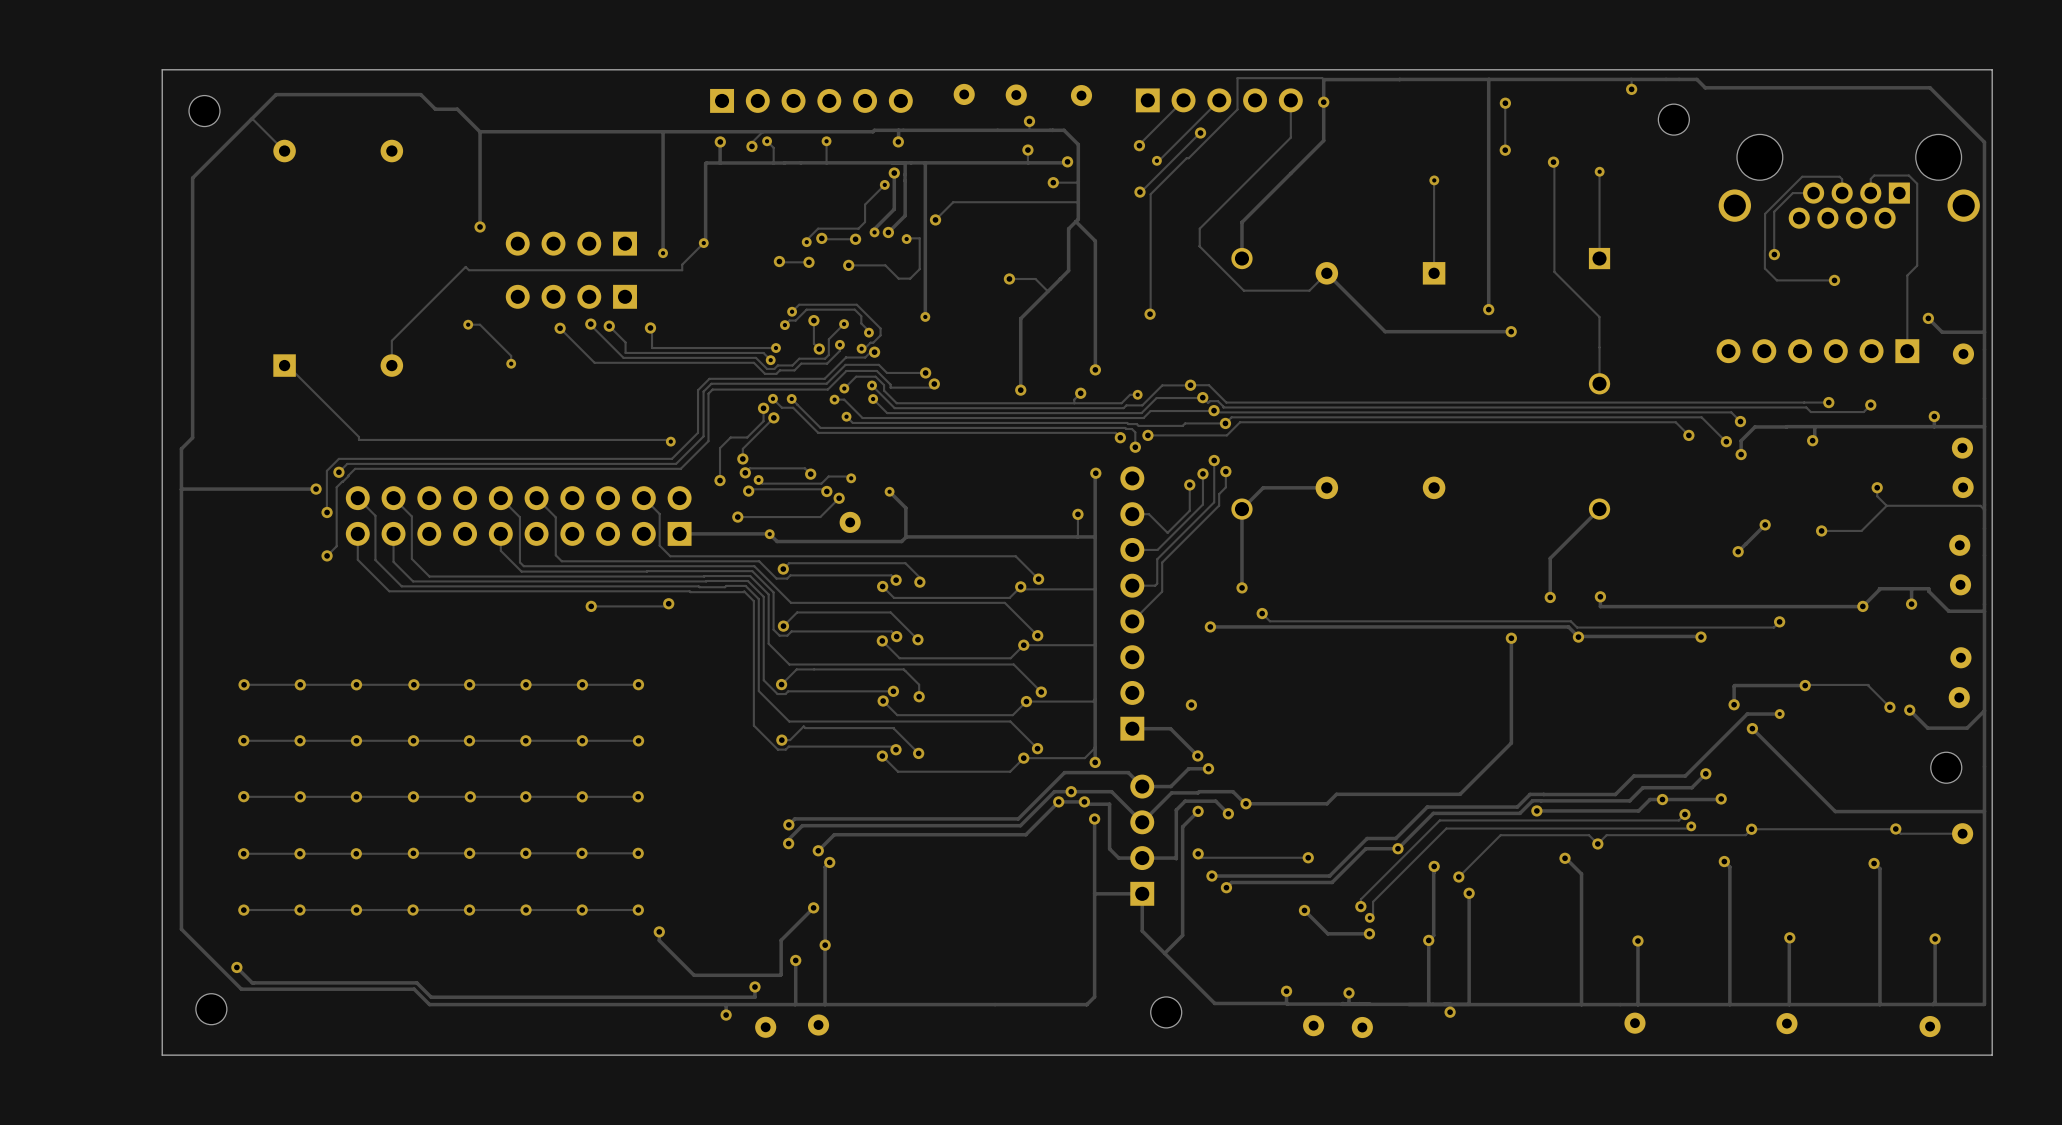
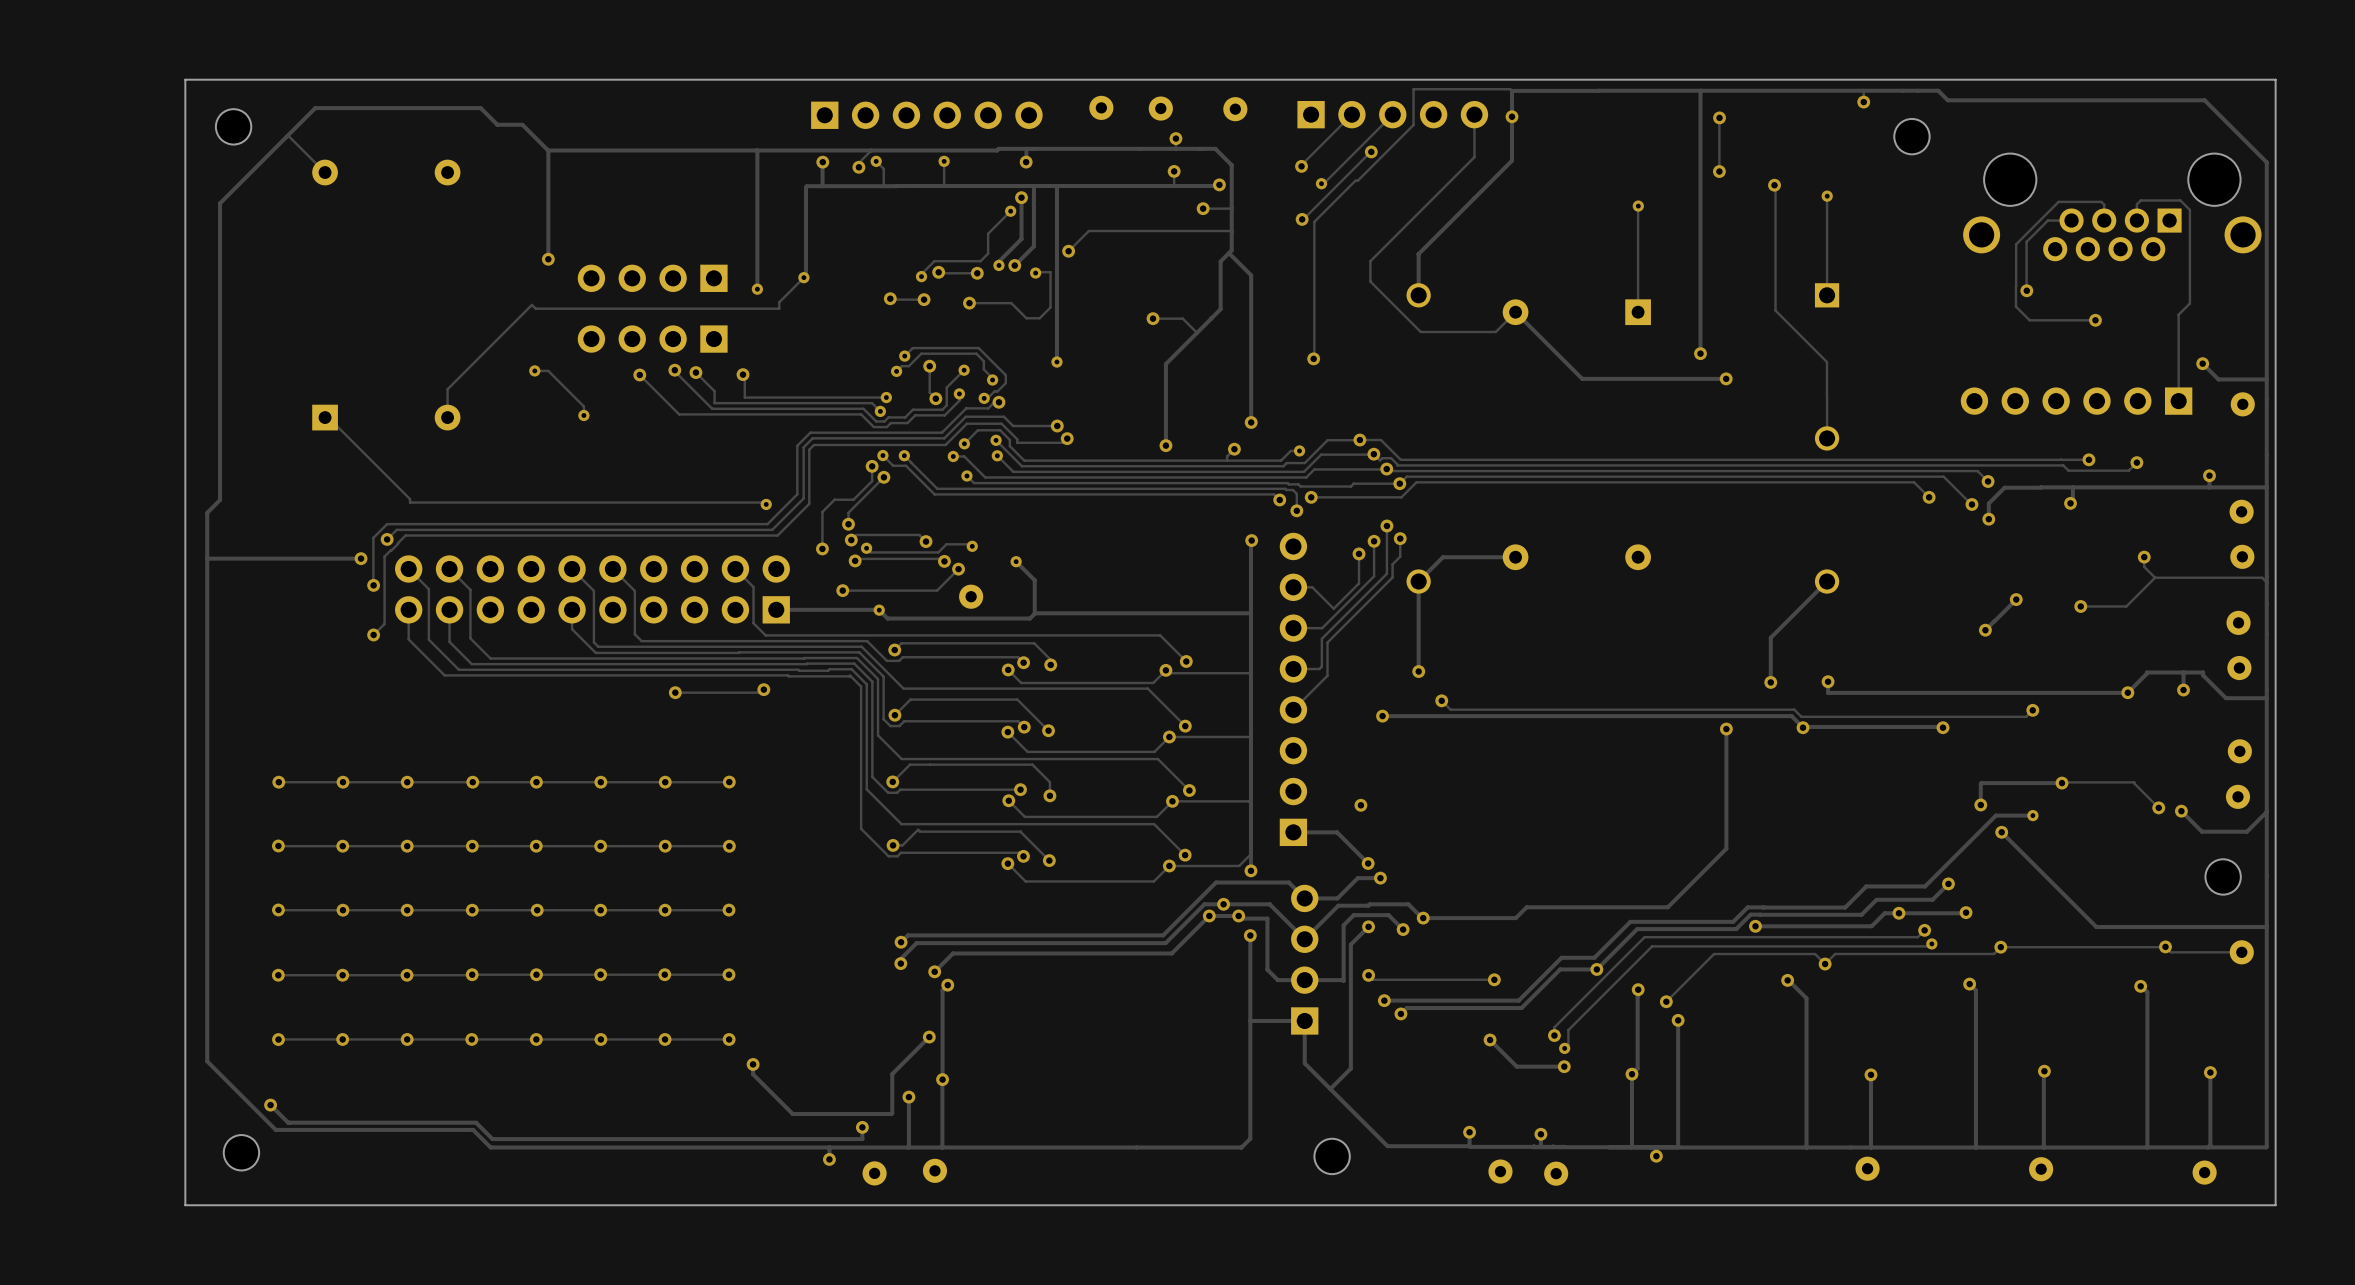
track: (1077, 514) (1077, 536) -> none
via: (1077, 514) -> none

